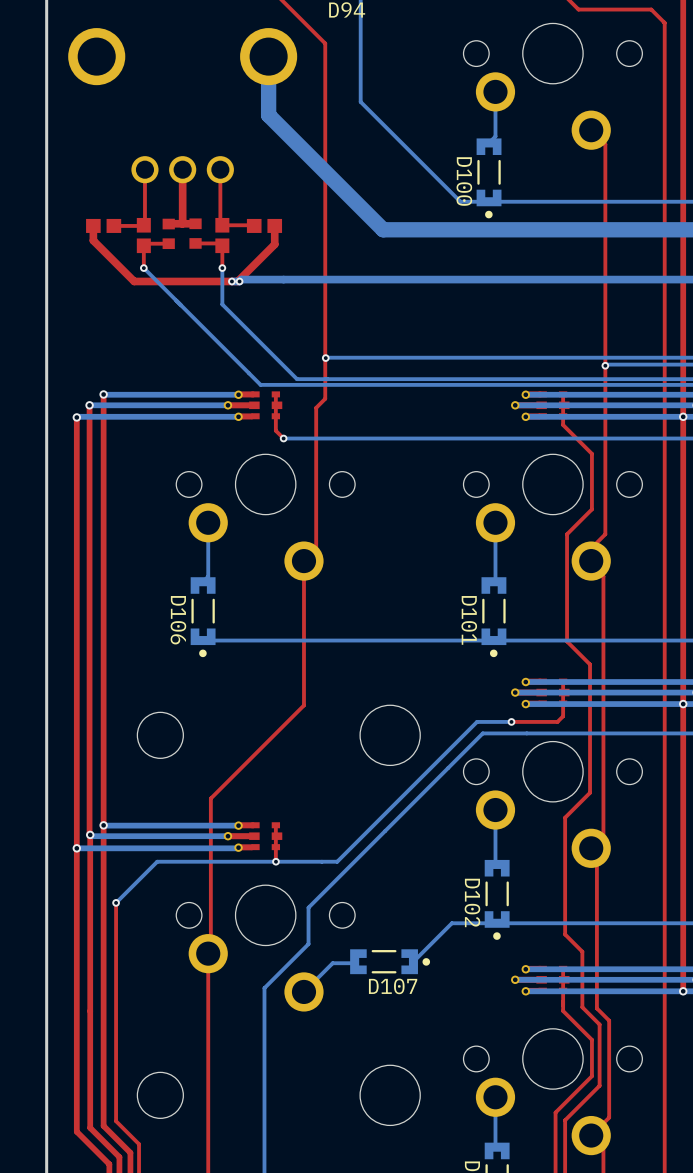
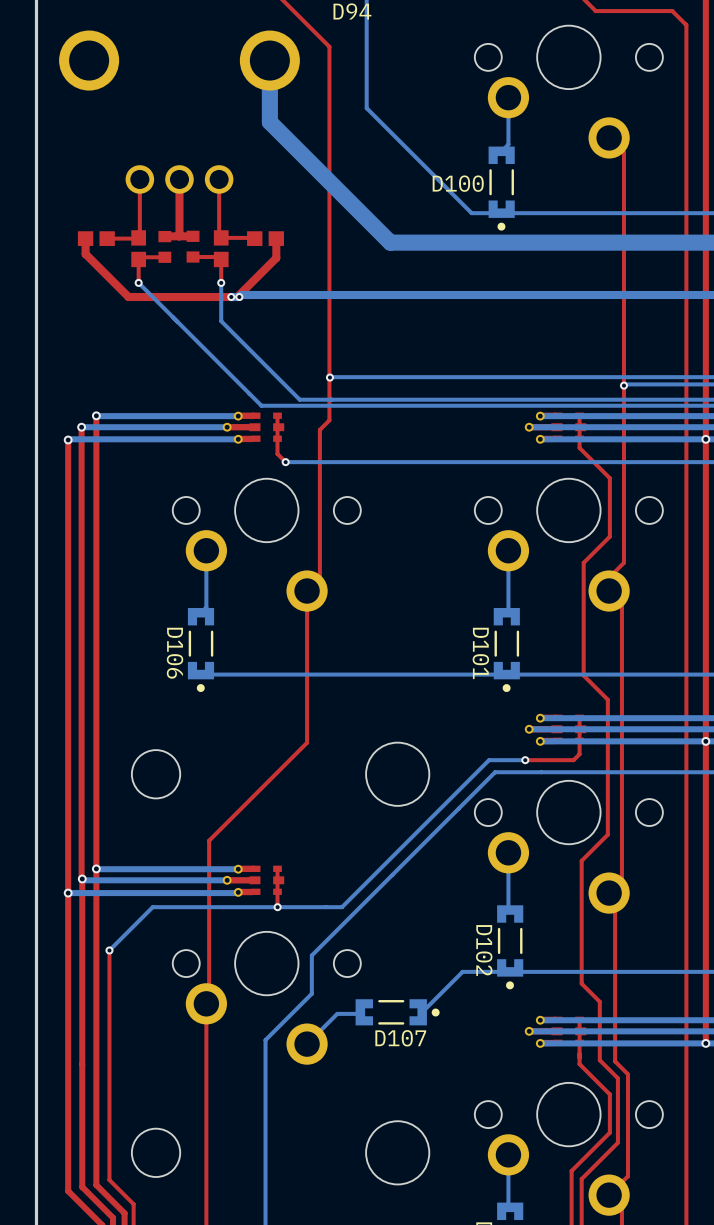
D100 name rotation: 0° (464, 181) -> 90° counterclockwise (458, 183)

